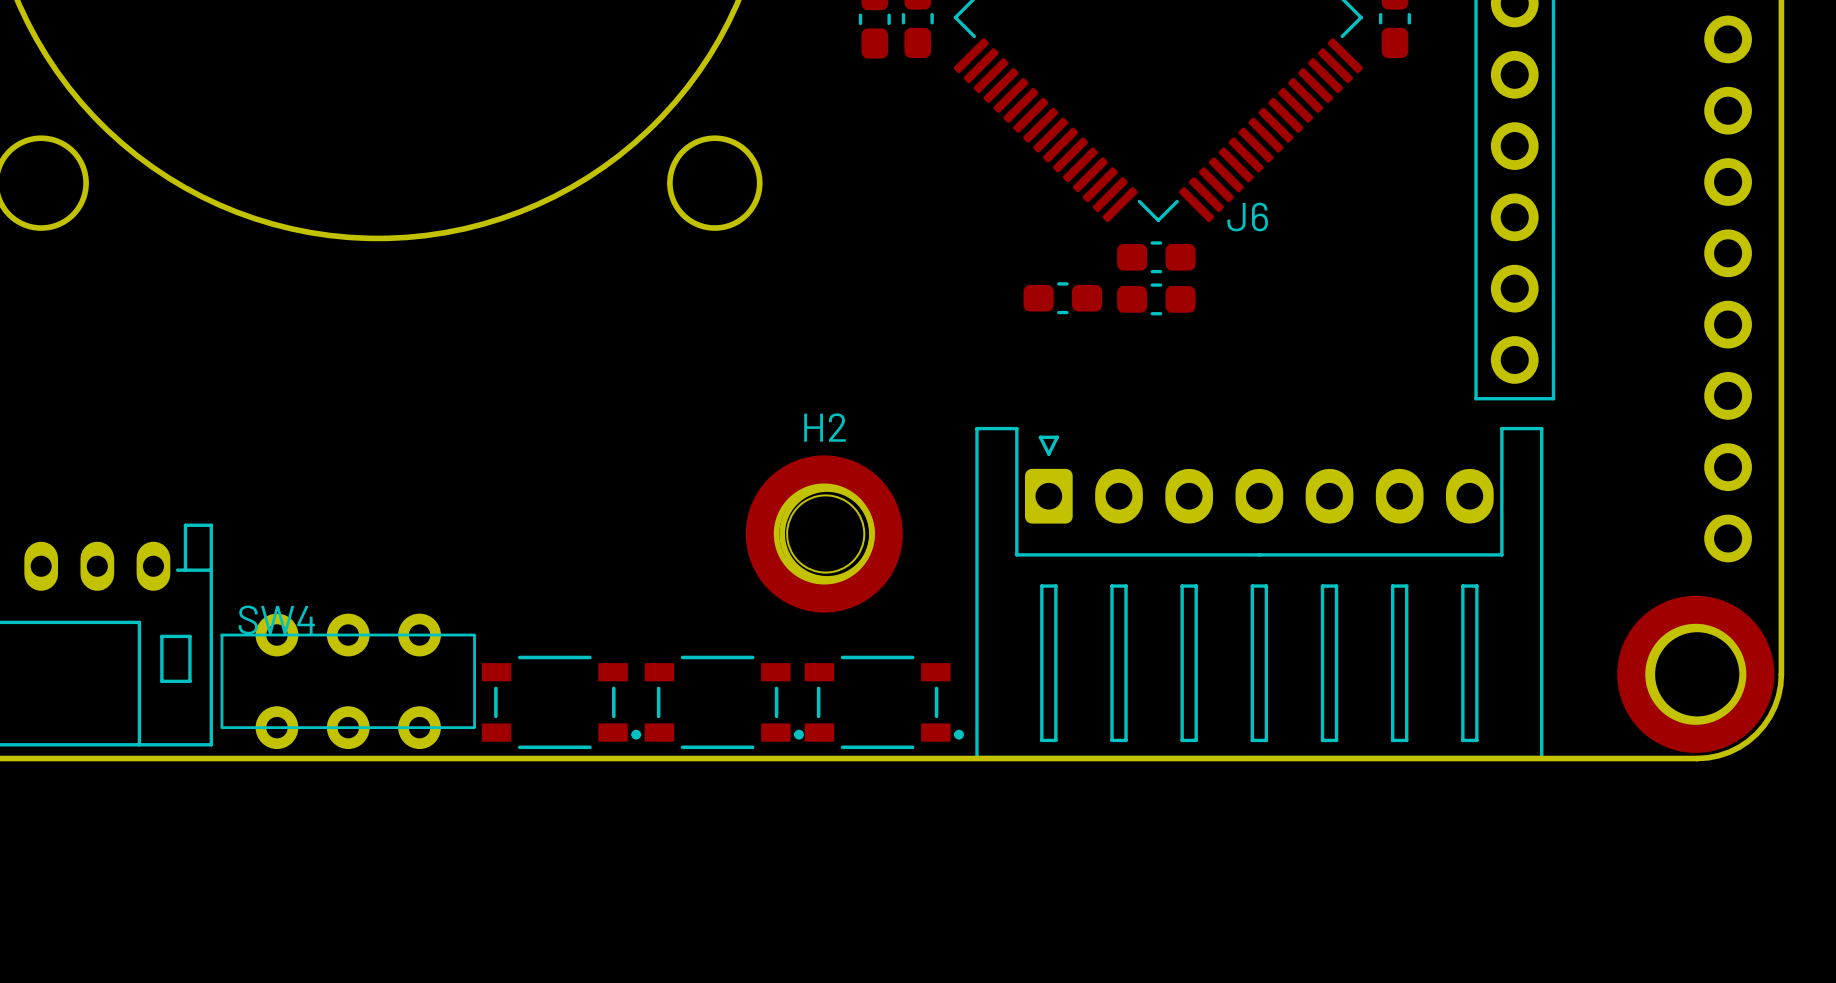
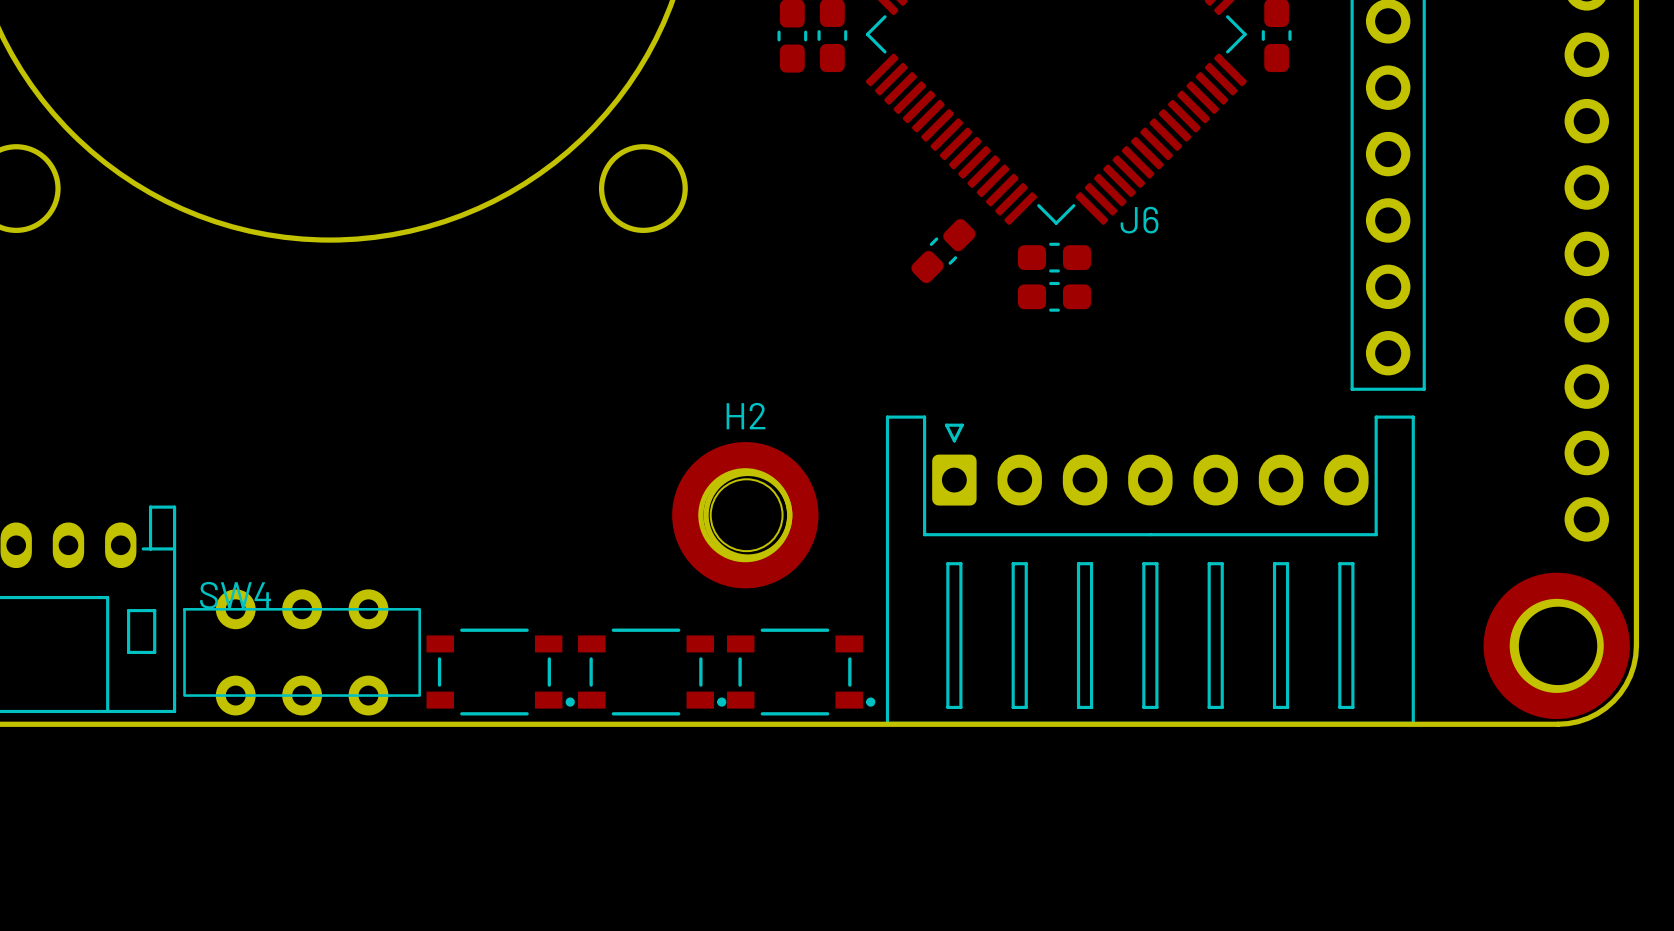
part: none -> (943, 251)
part: (1062, 298) -> none

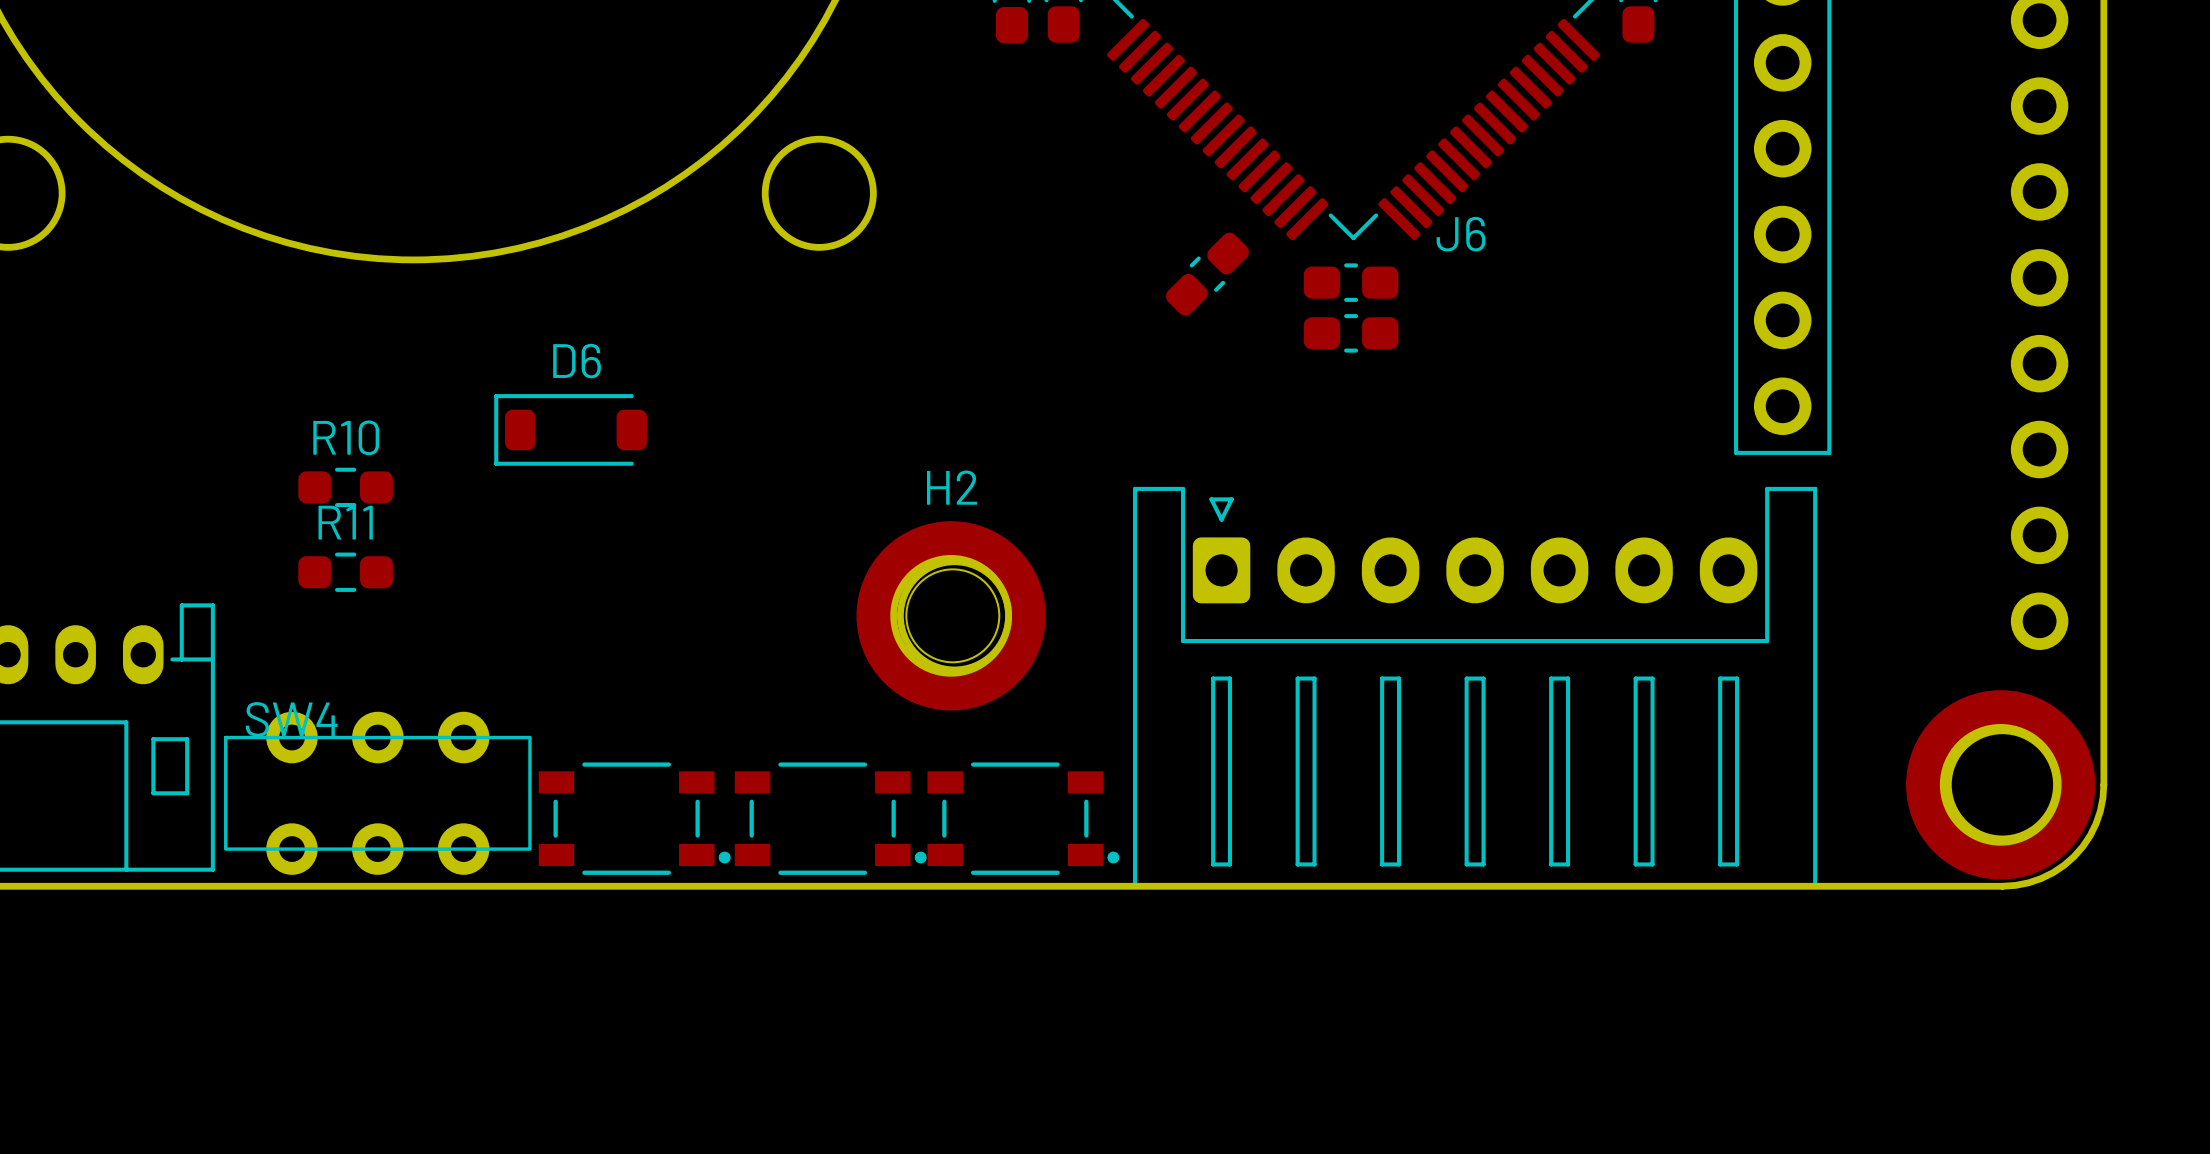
D6: none -> (570, 429)
R10: none -> (345, 487)
R11: none -> (345, 572)

